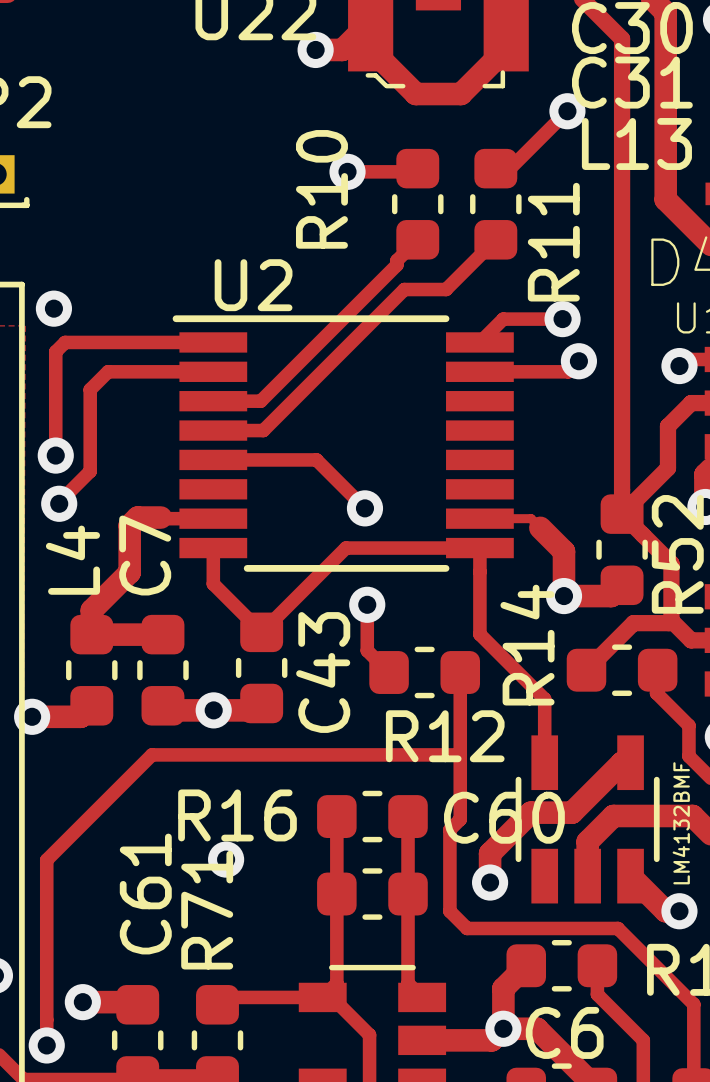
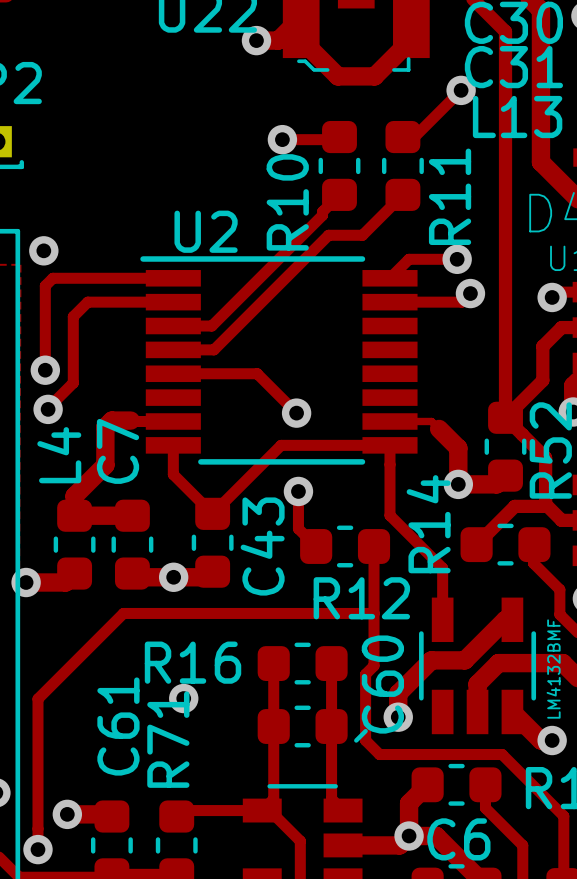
R10 name position: R10 (321, 189) -> R10 (287, 202)
C60 name rotation: 0° (504, 817) -> 90° counterclockwise (382, 684)
line: none -> (365, 731) (356, 740)

